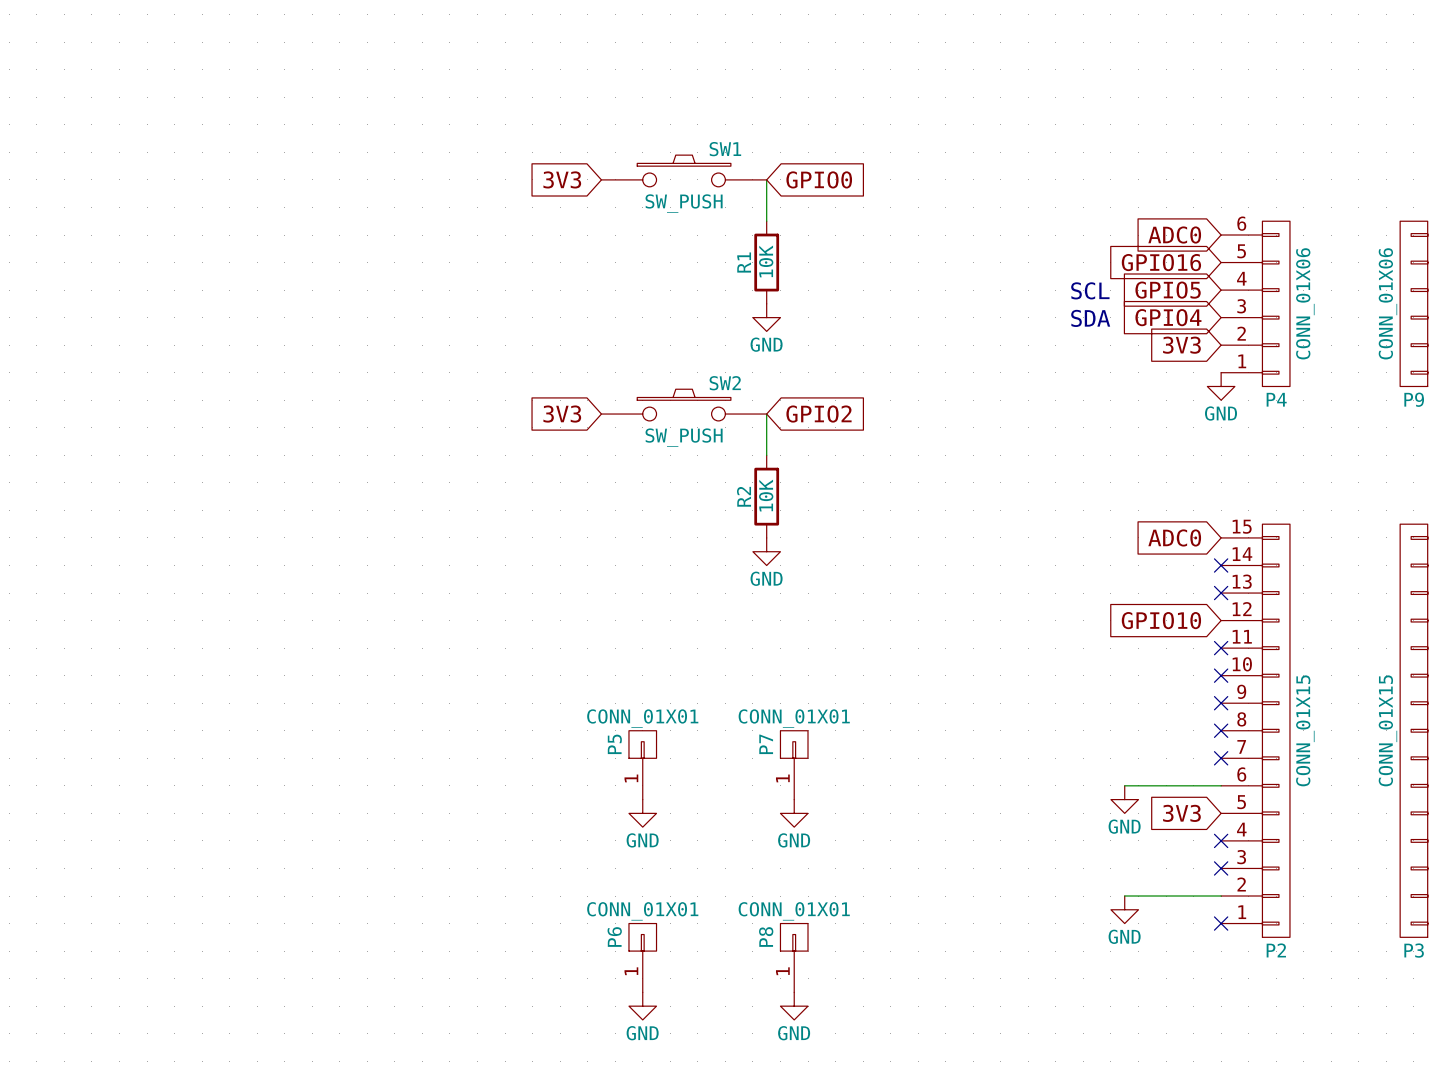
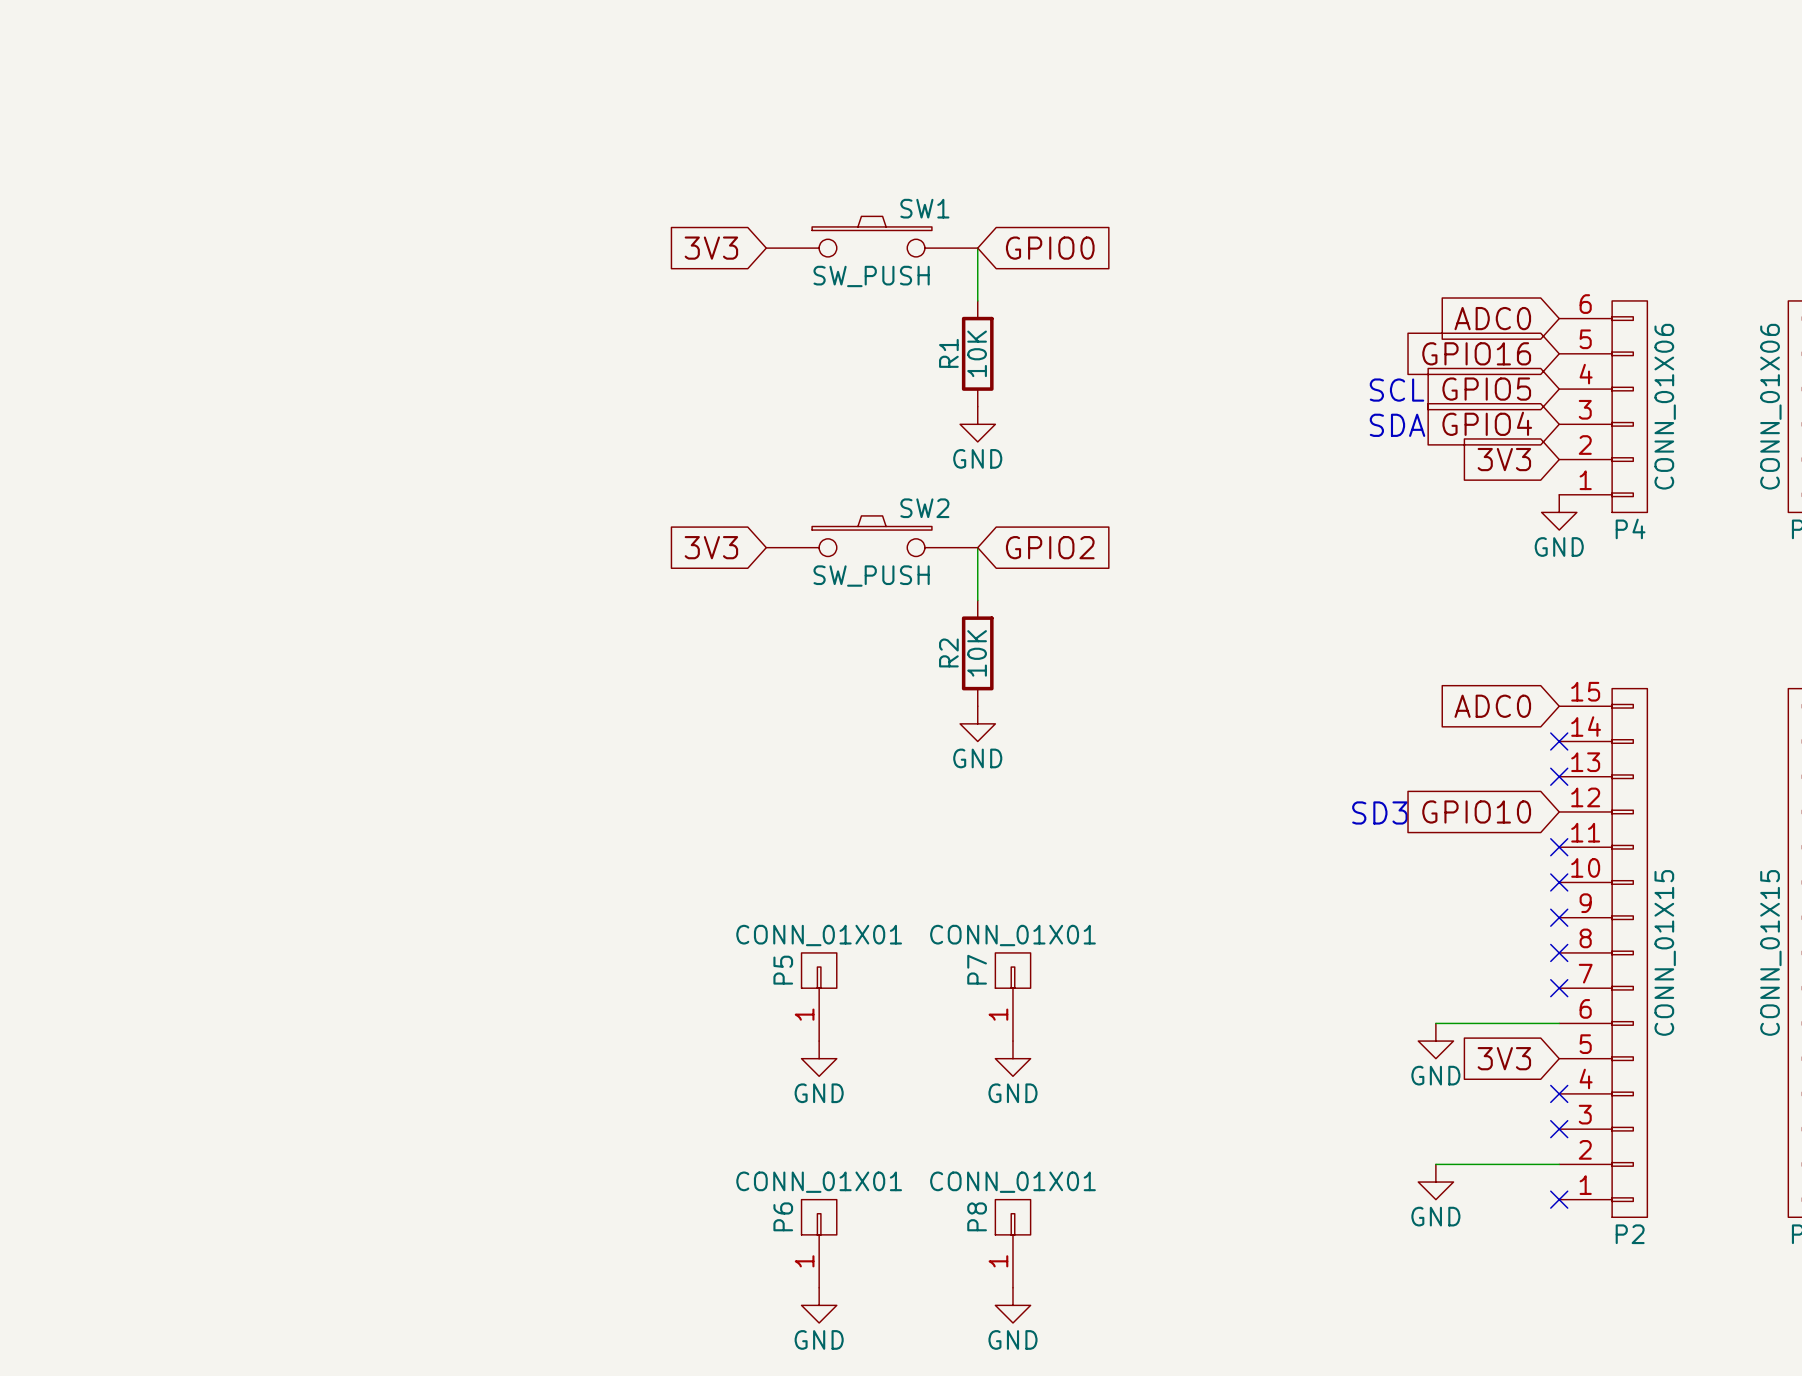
text: none -> SD3 (1379, 812)

